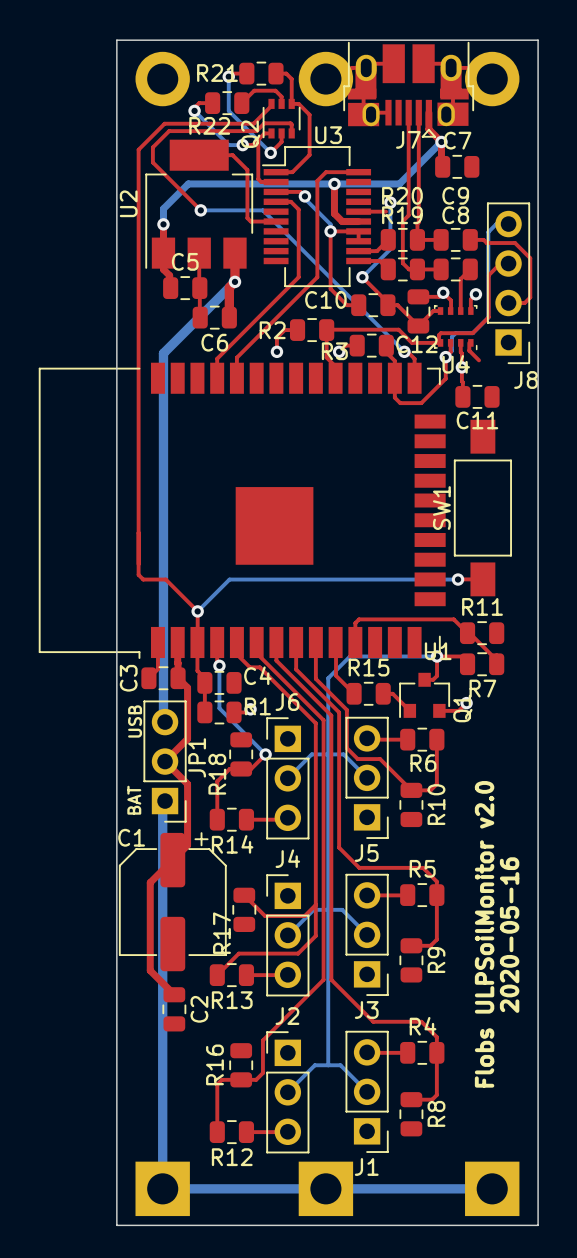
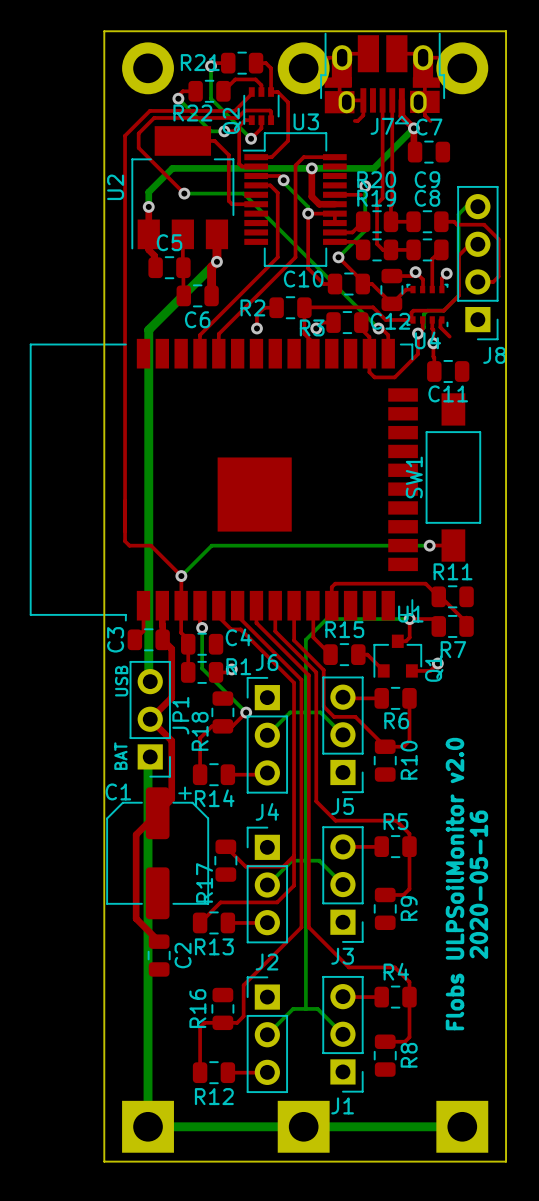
top track: none -> (363, 95) (363, 115) (357, 120) (354, 120)
top track: none -> (424, 101) (424, 115) (430, 120)

